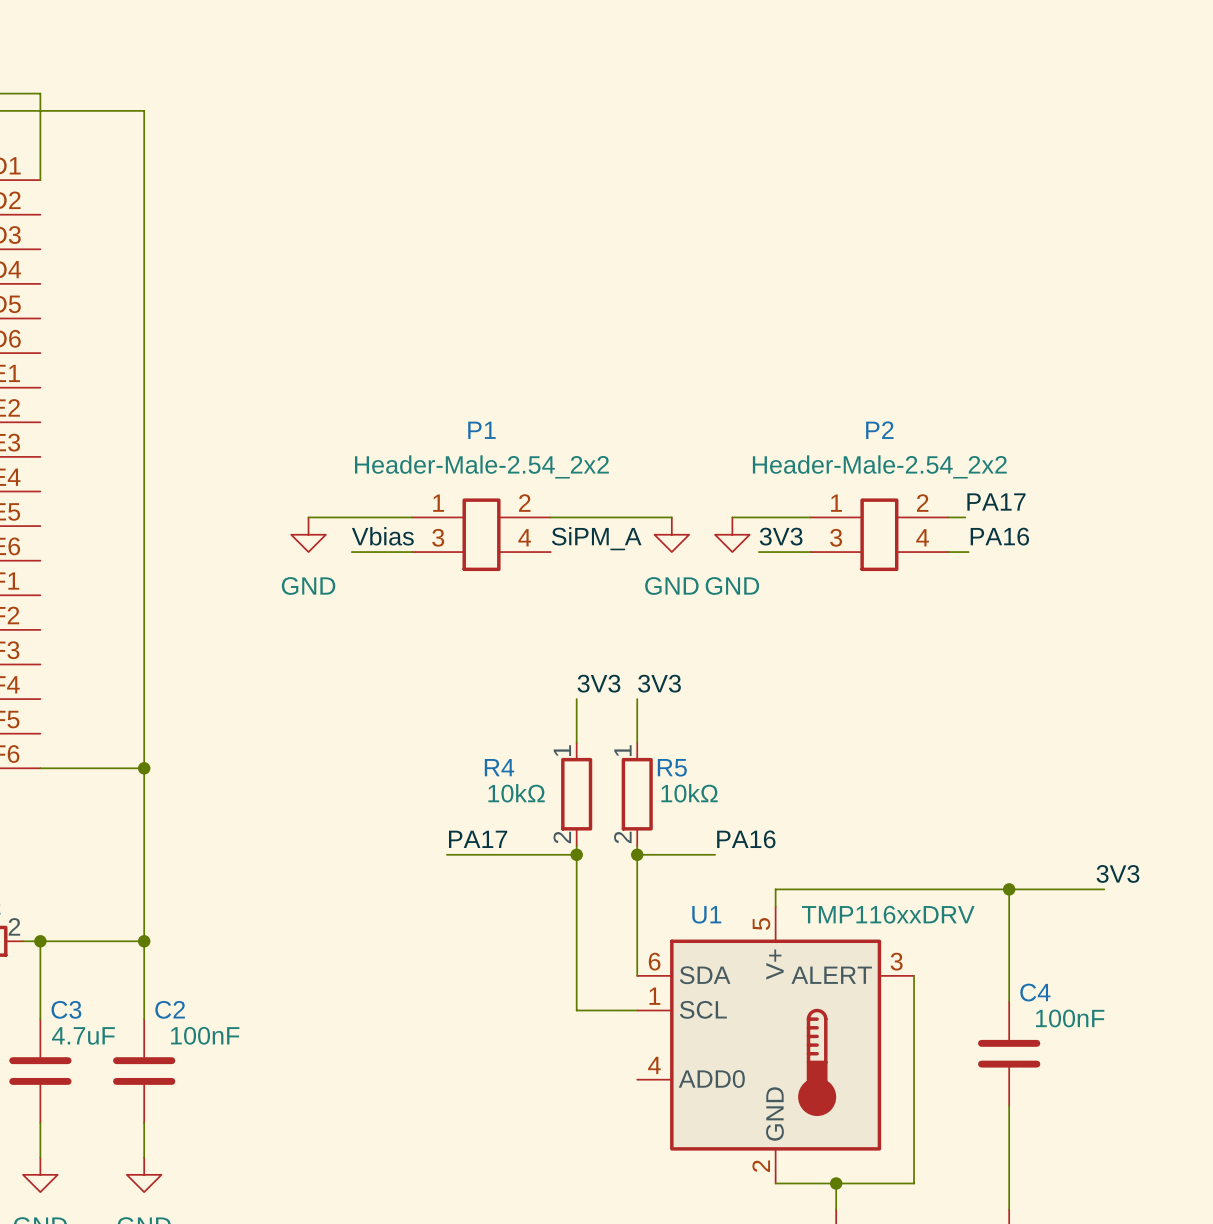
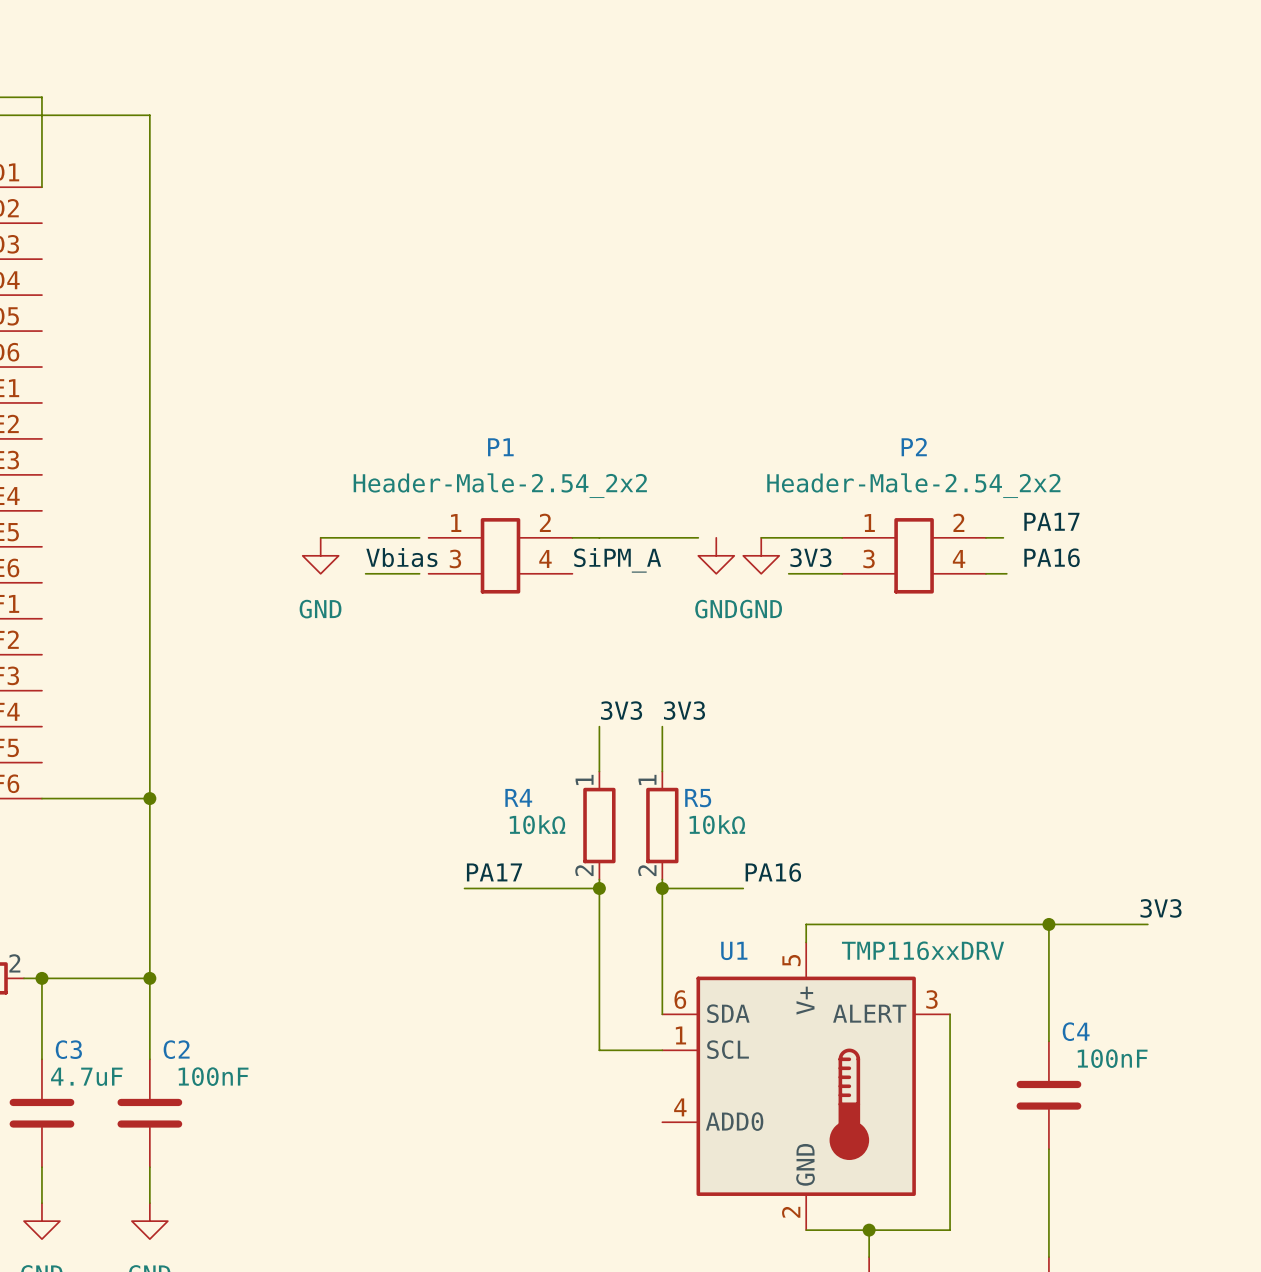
label position: PA17 (996, 502) -> PA17 (1051, 521)
wire: (403, 517) (412, 517) -> none
power symbol position: GND (671, 534) -> GND (716, 555)
label position: PA16 (999, 536) -> PA16 (1052, 557)
wire: (403, 552) (412, 552) -> none

